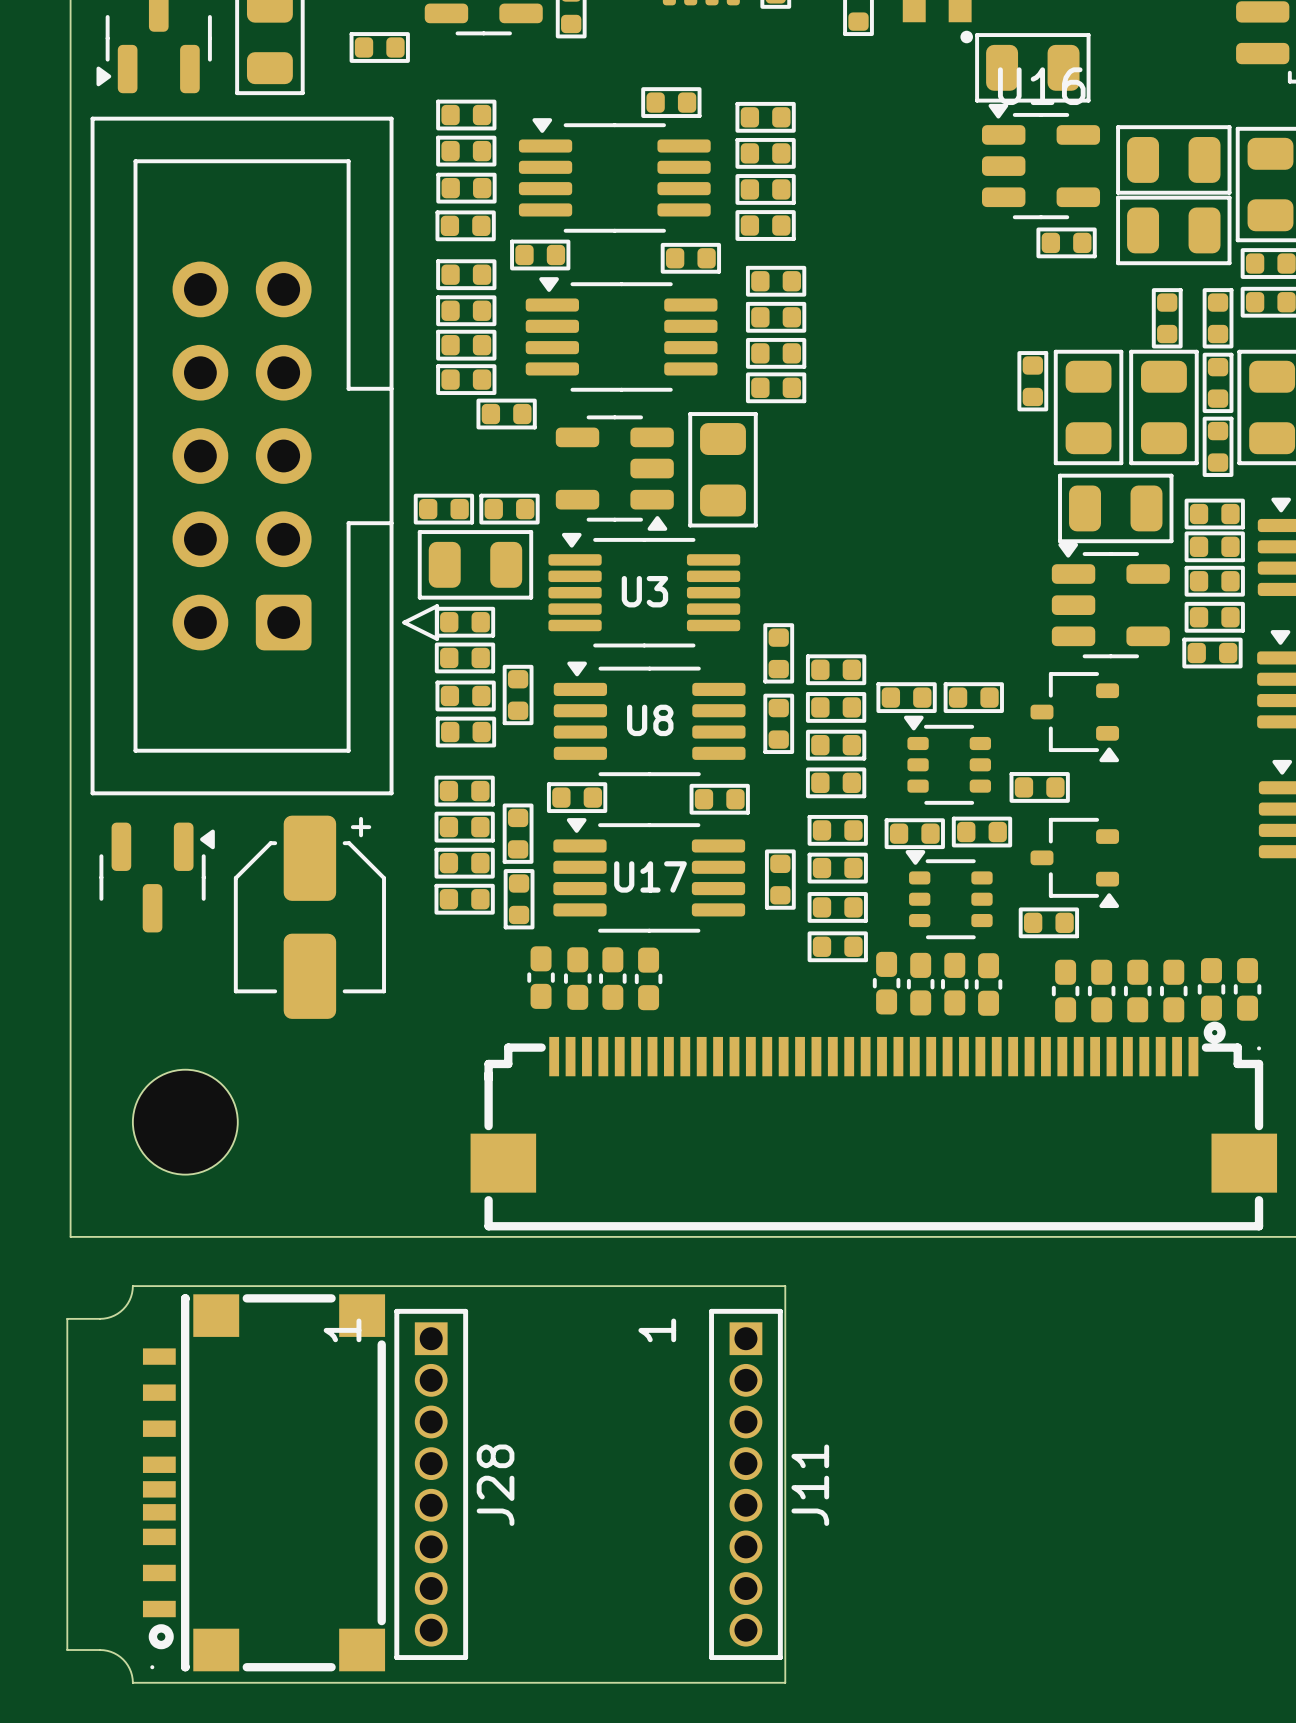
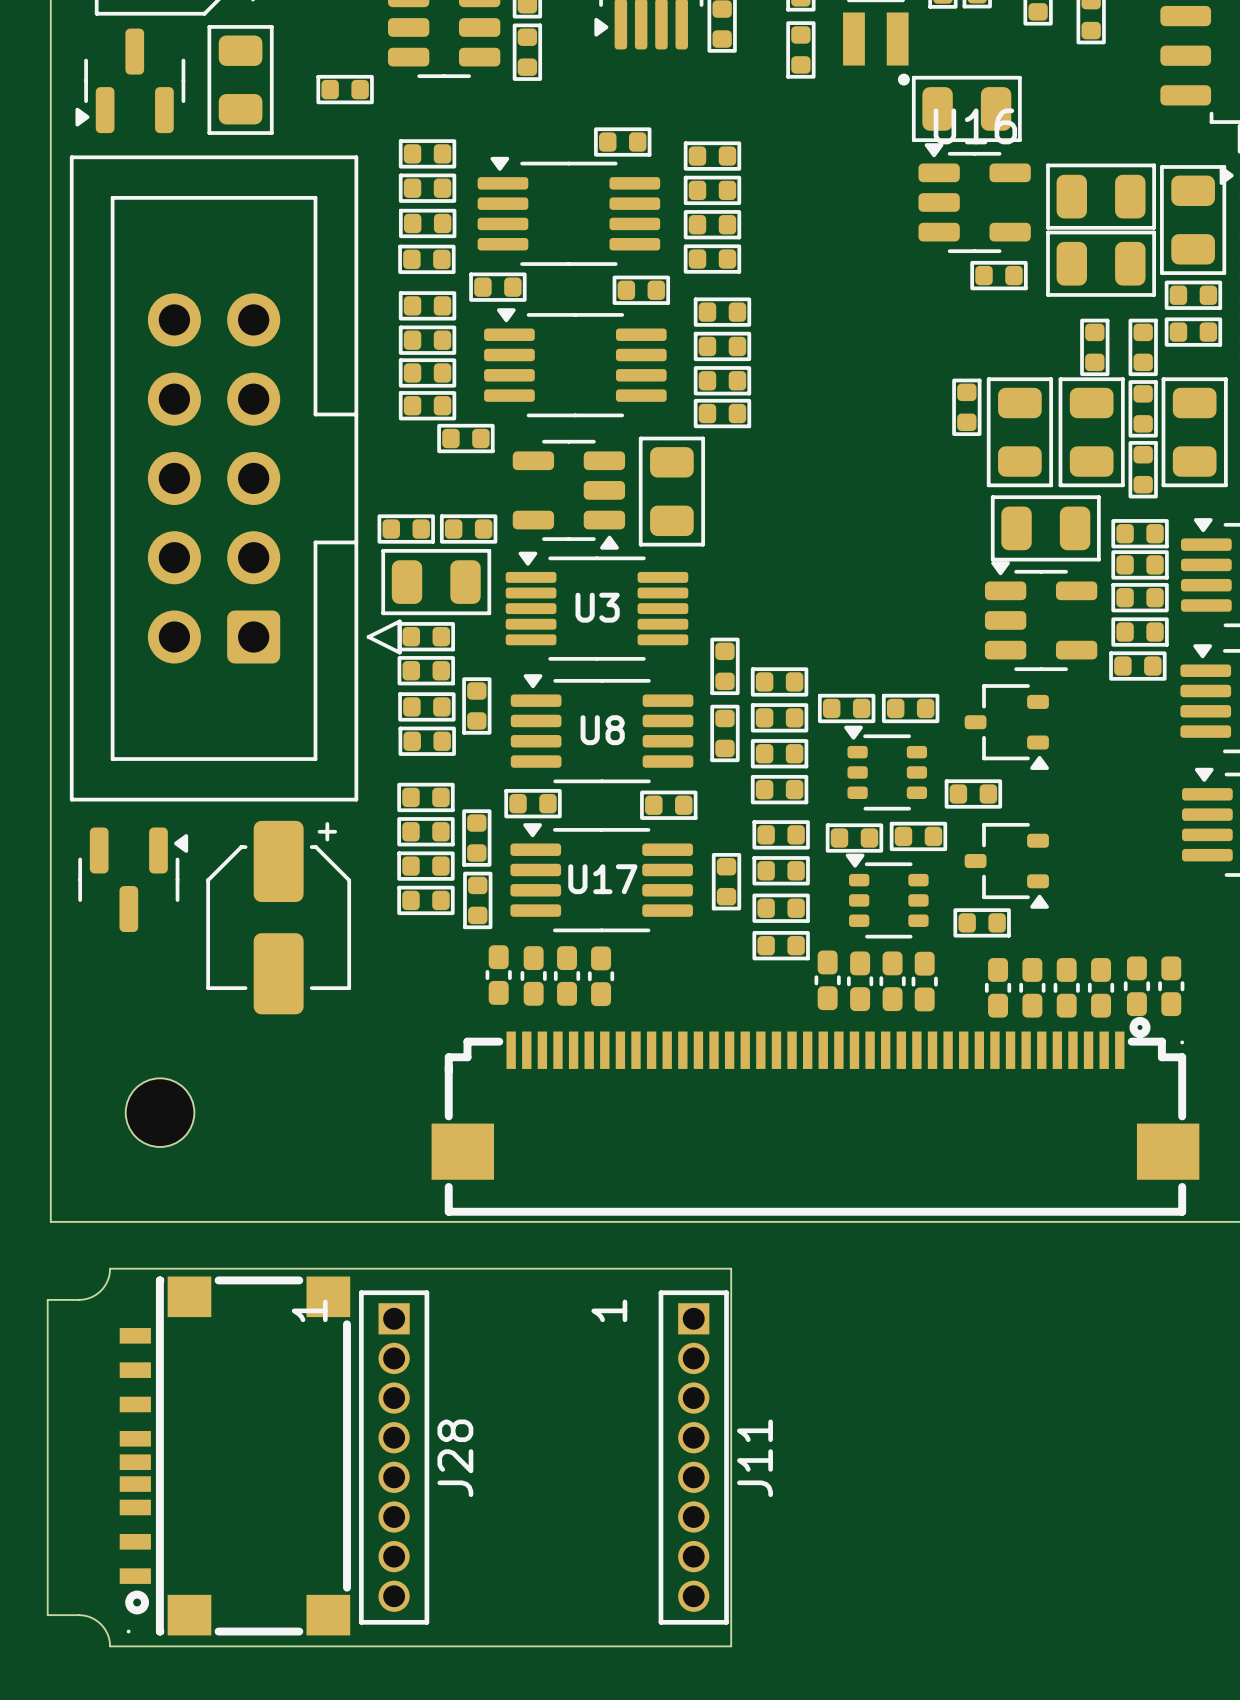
part footprint: [132, 1069, 238, 1175] -> [125, 1078, 195, 1147]

